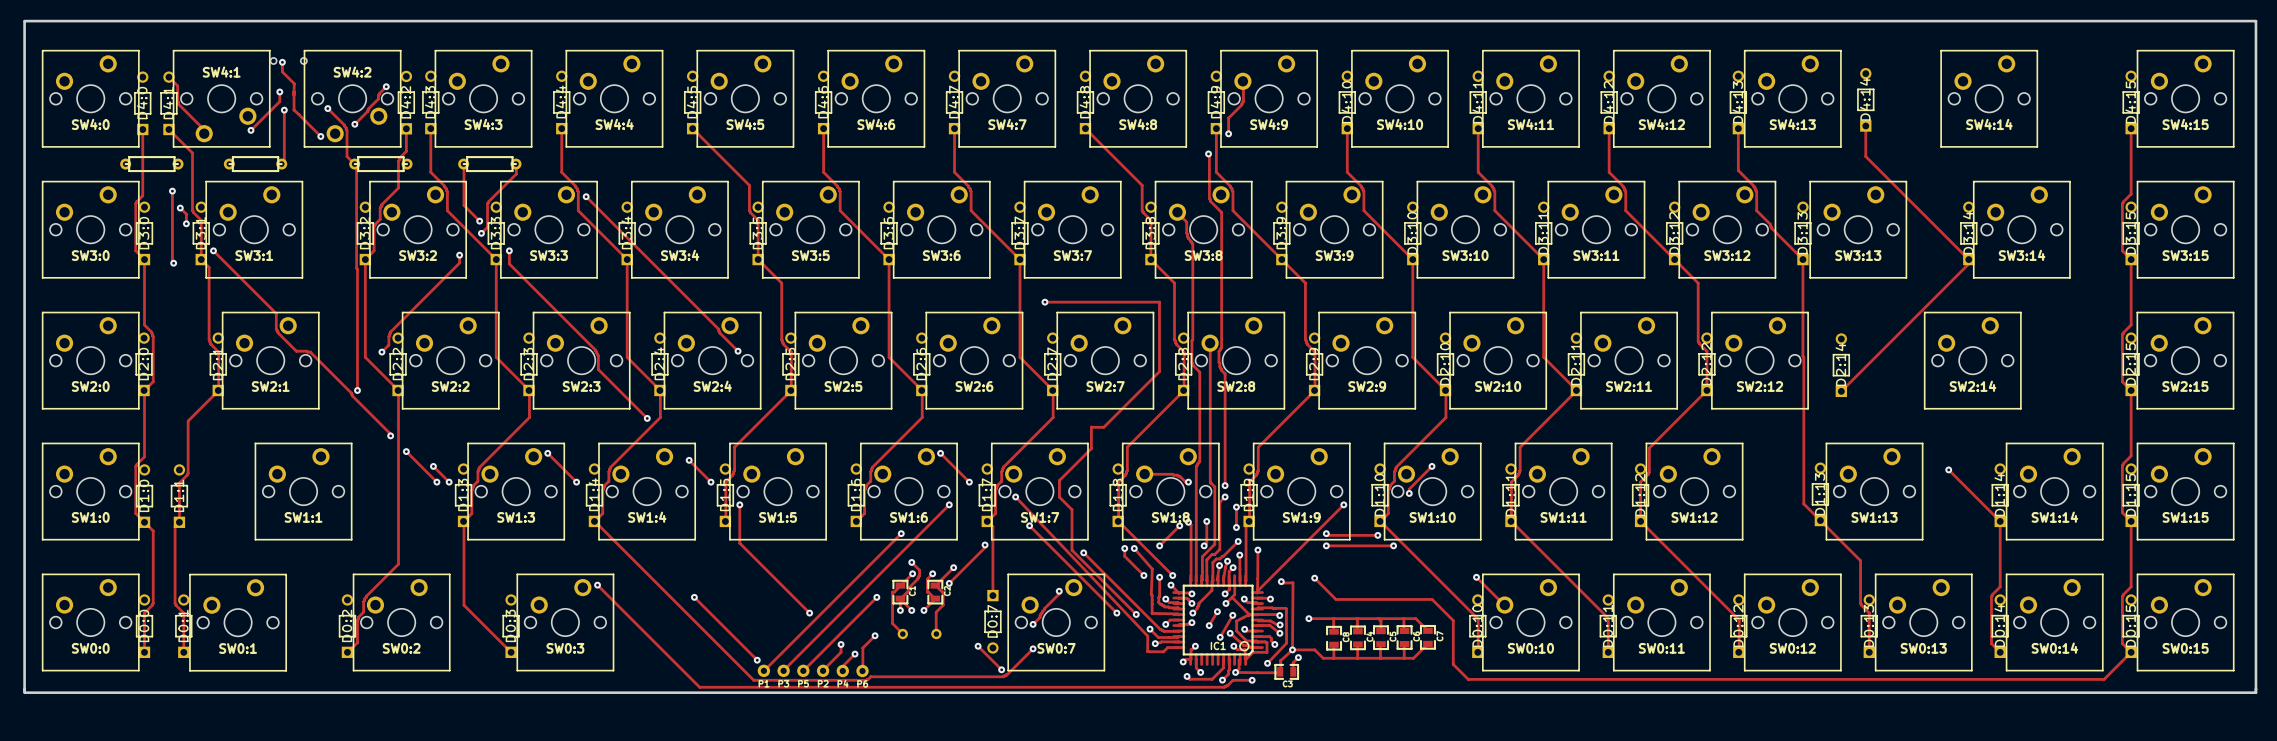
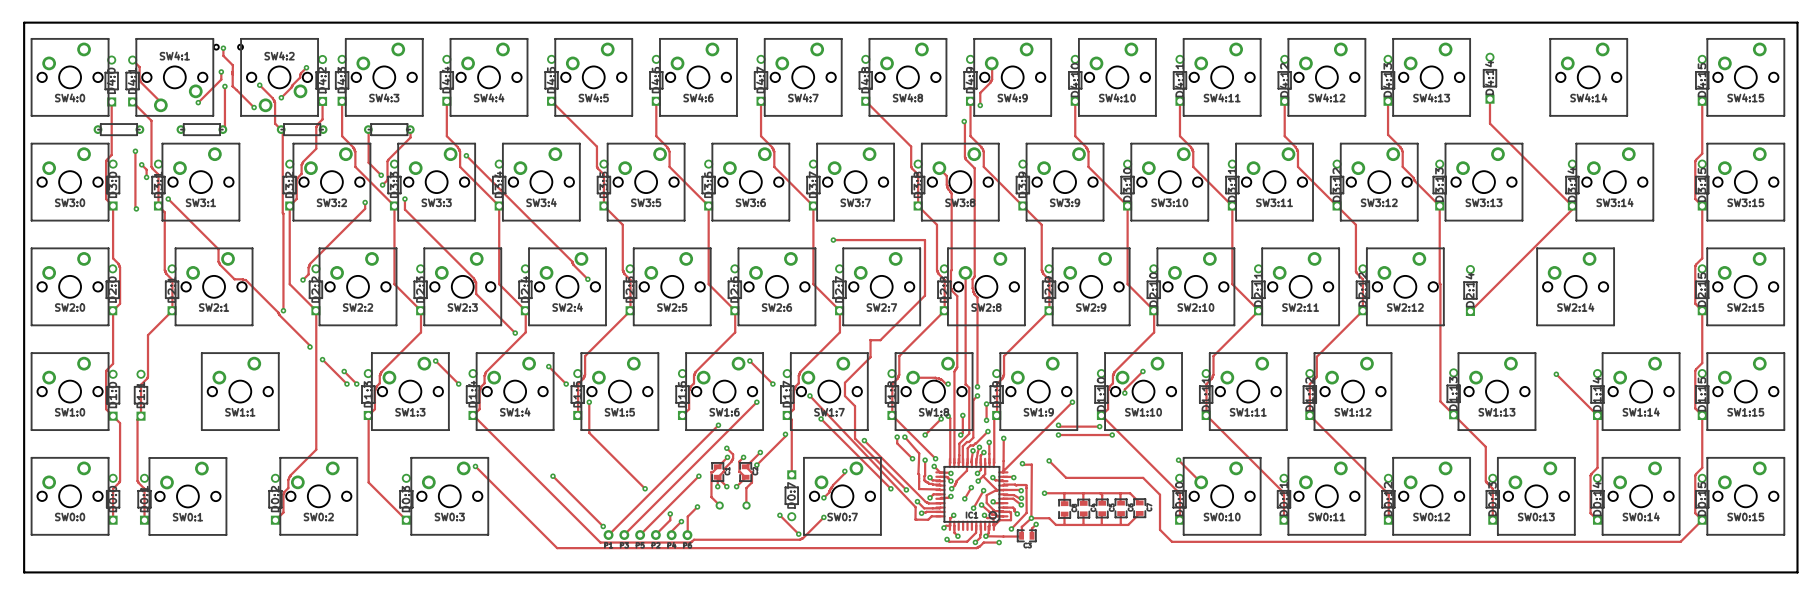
board edge: (24, 21) (2255, 21) (2255, 692) -> none
board edge: (24, 21) (24, 692) -> none
board edge: none -> (24, 22) (1797, 22) (1797, 572) (24, 572) (24, 22)
board edge: (24, 692) (2255, 692) -> none

